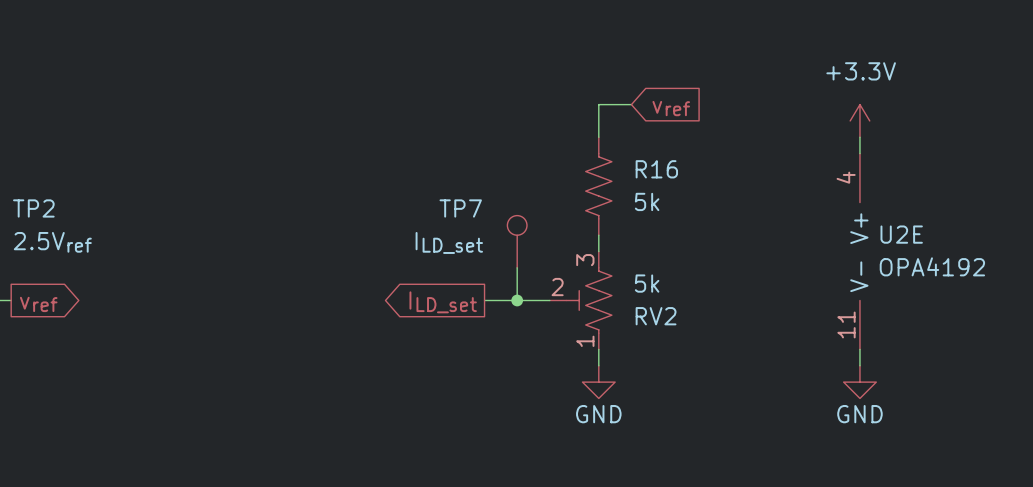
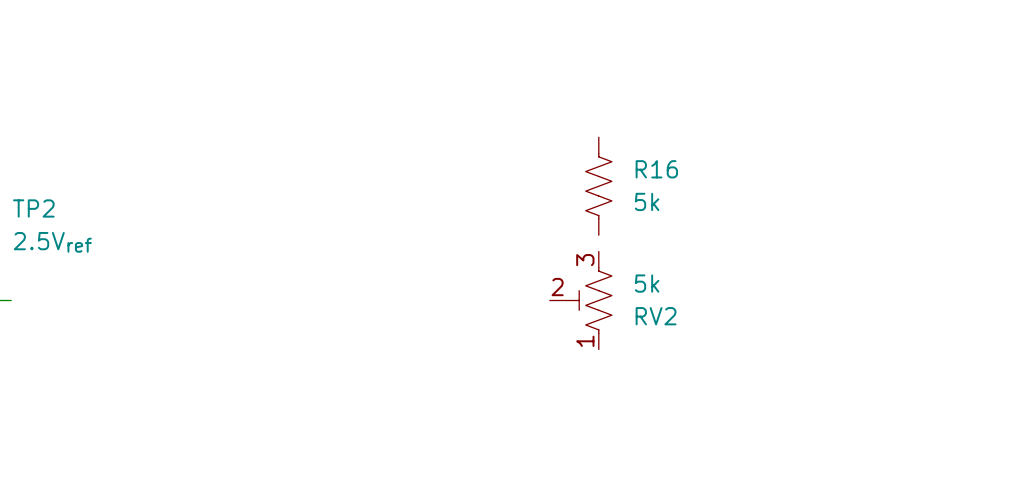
wire: (631, 104) (598, 104) (598, 137) -> none
global label: vref (671, 108) -> none
power symbol: +3.3V (859, 120) -> none
wire: (859, 137) (859, 153) -> none
wire: (598, 235) (598, 251) -> none
TP7: ILD_set (517, 241) -> none
U2E: OPA4192 (859, 251) -> none
wire: (517, 267) (517, 300) -> none
wire: (484, 300) (549, 300) -> none
junction: (517, 300) -> none
global label: ILD_set (443, 302) -> none
global label: vref (38, 304) -> none
wire: (598, 349) (598, 365) -> none
wire: (859, 349) (859, 365) -> none
power symbol: GND (598, 382) -> none
power symbol: GND (859, 382) -> none

